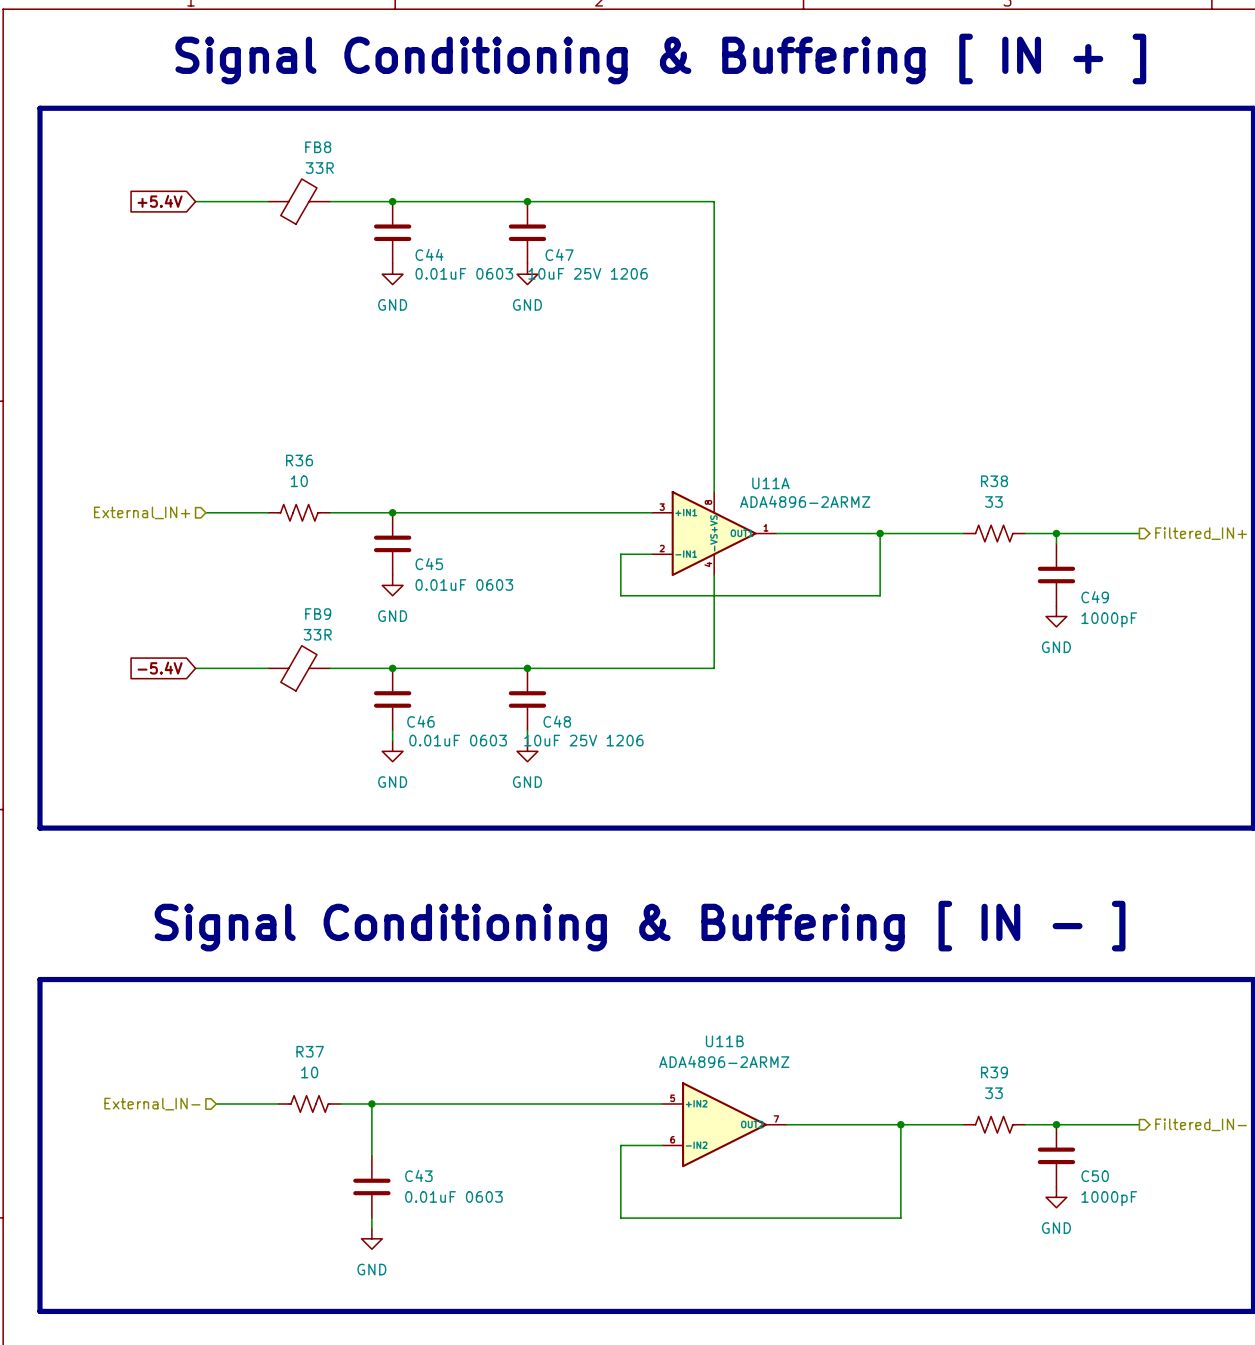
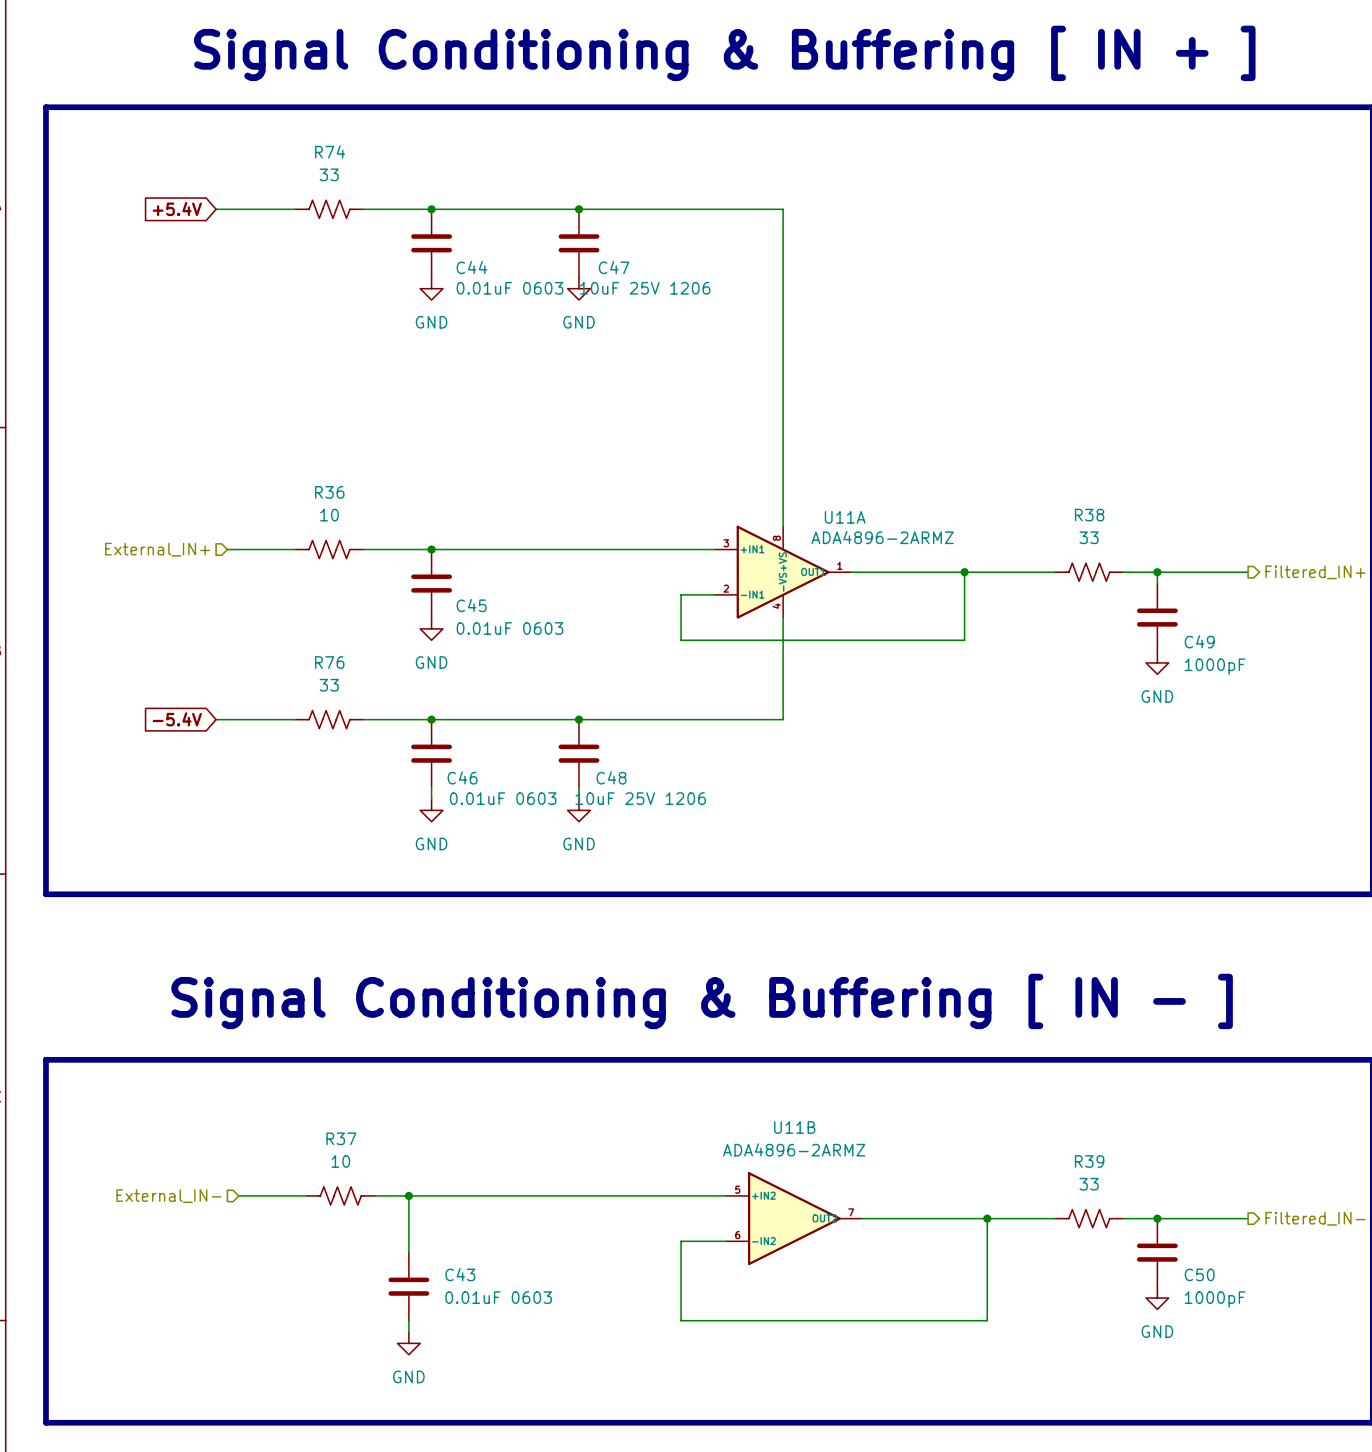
FB8: 33R (299, 201) -> none
R74: none -> 33 (329, 209)
FB9: 33R (299, 668) -> none
R76: none -> 33 (329, 719)

